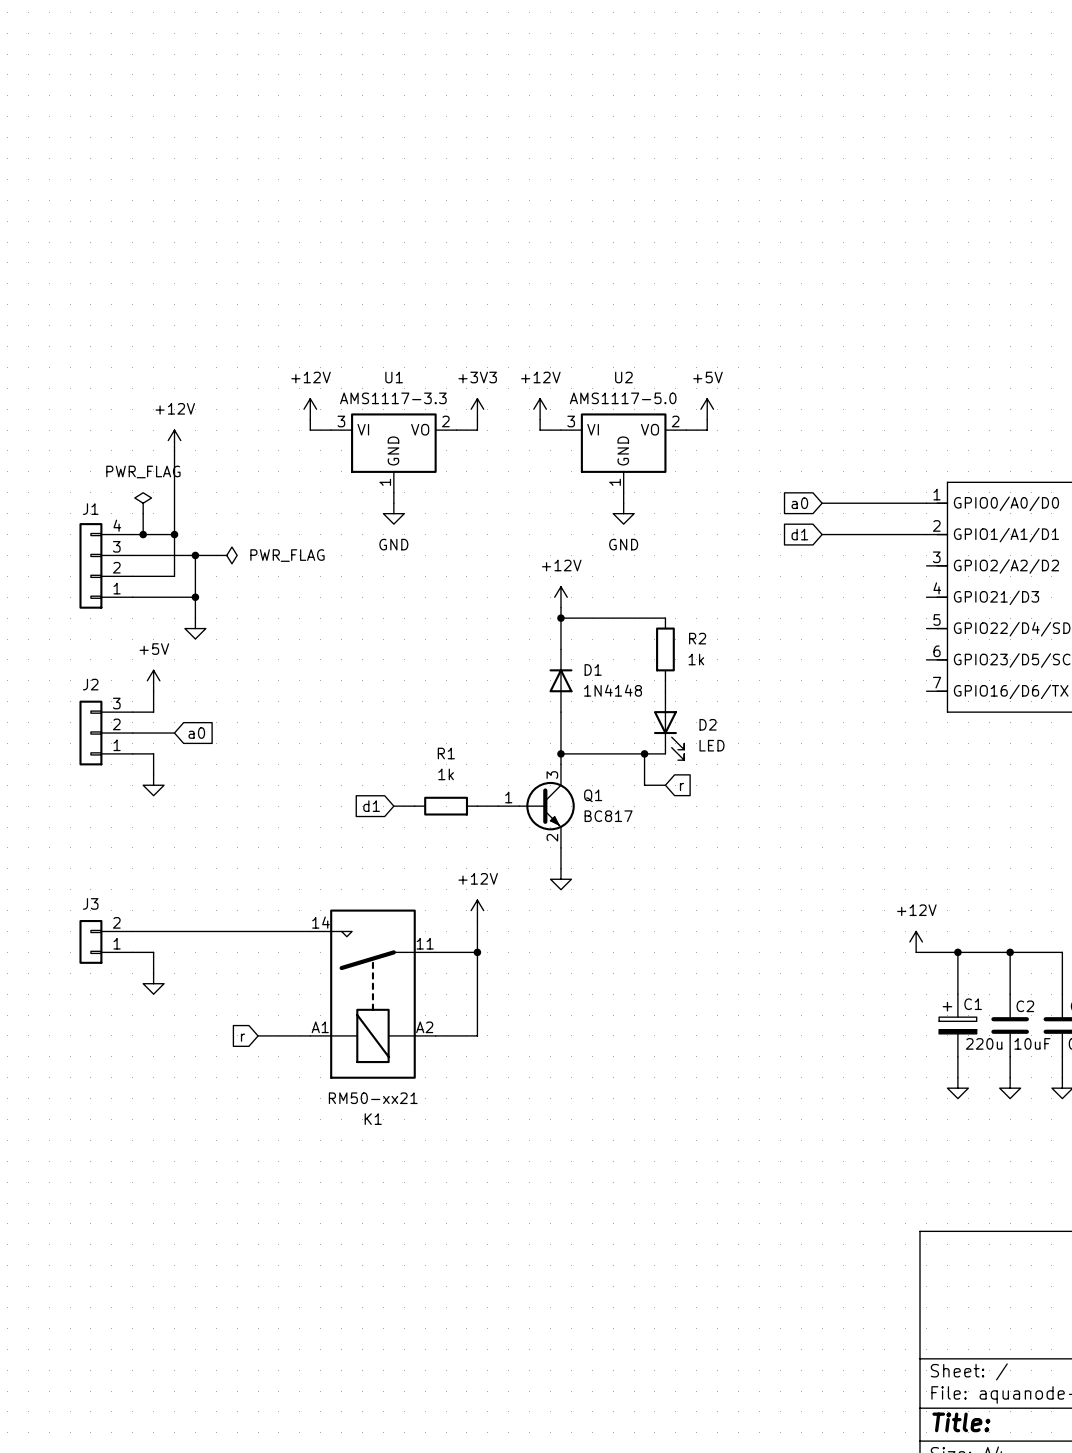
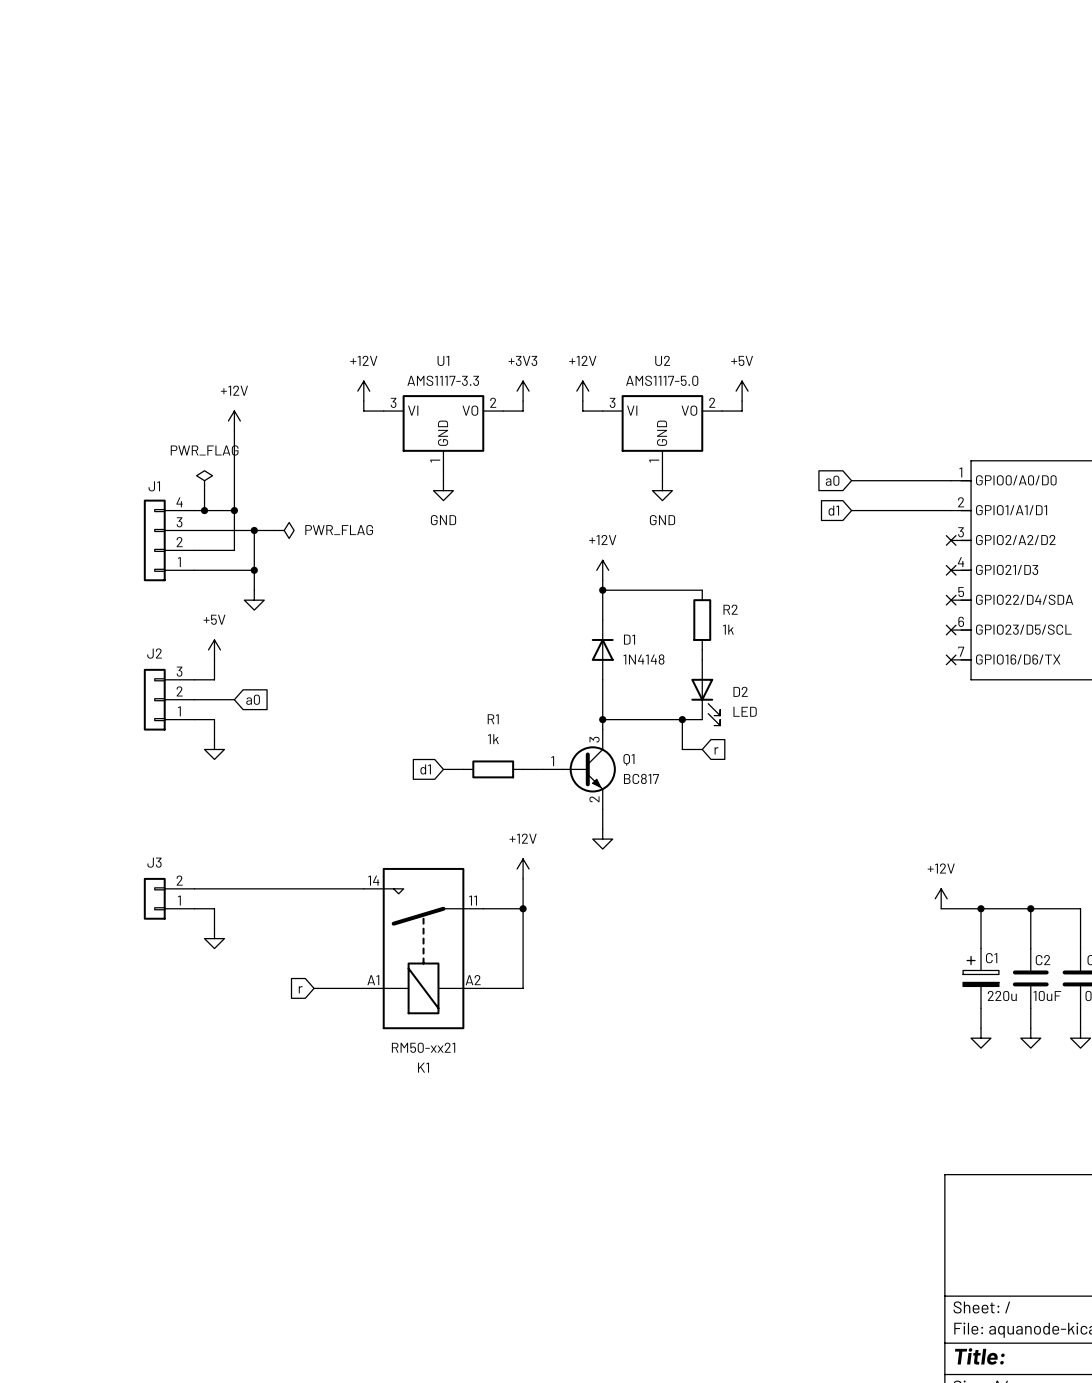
no-connect mark: none -> (951, 540)
no-connect mark: none -> (951, 570)
no-connect mark: none -> (951, 600)
no-connect mark: none -> (951, 630)
no-connect mark: none -> (951, 659)

